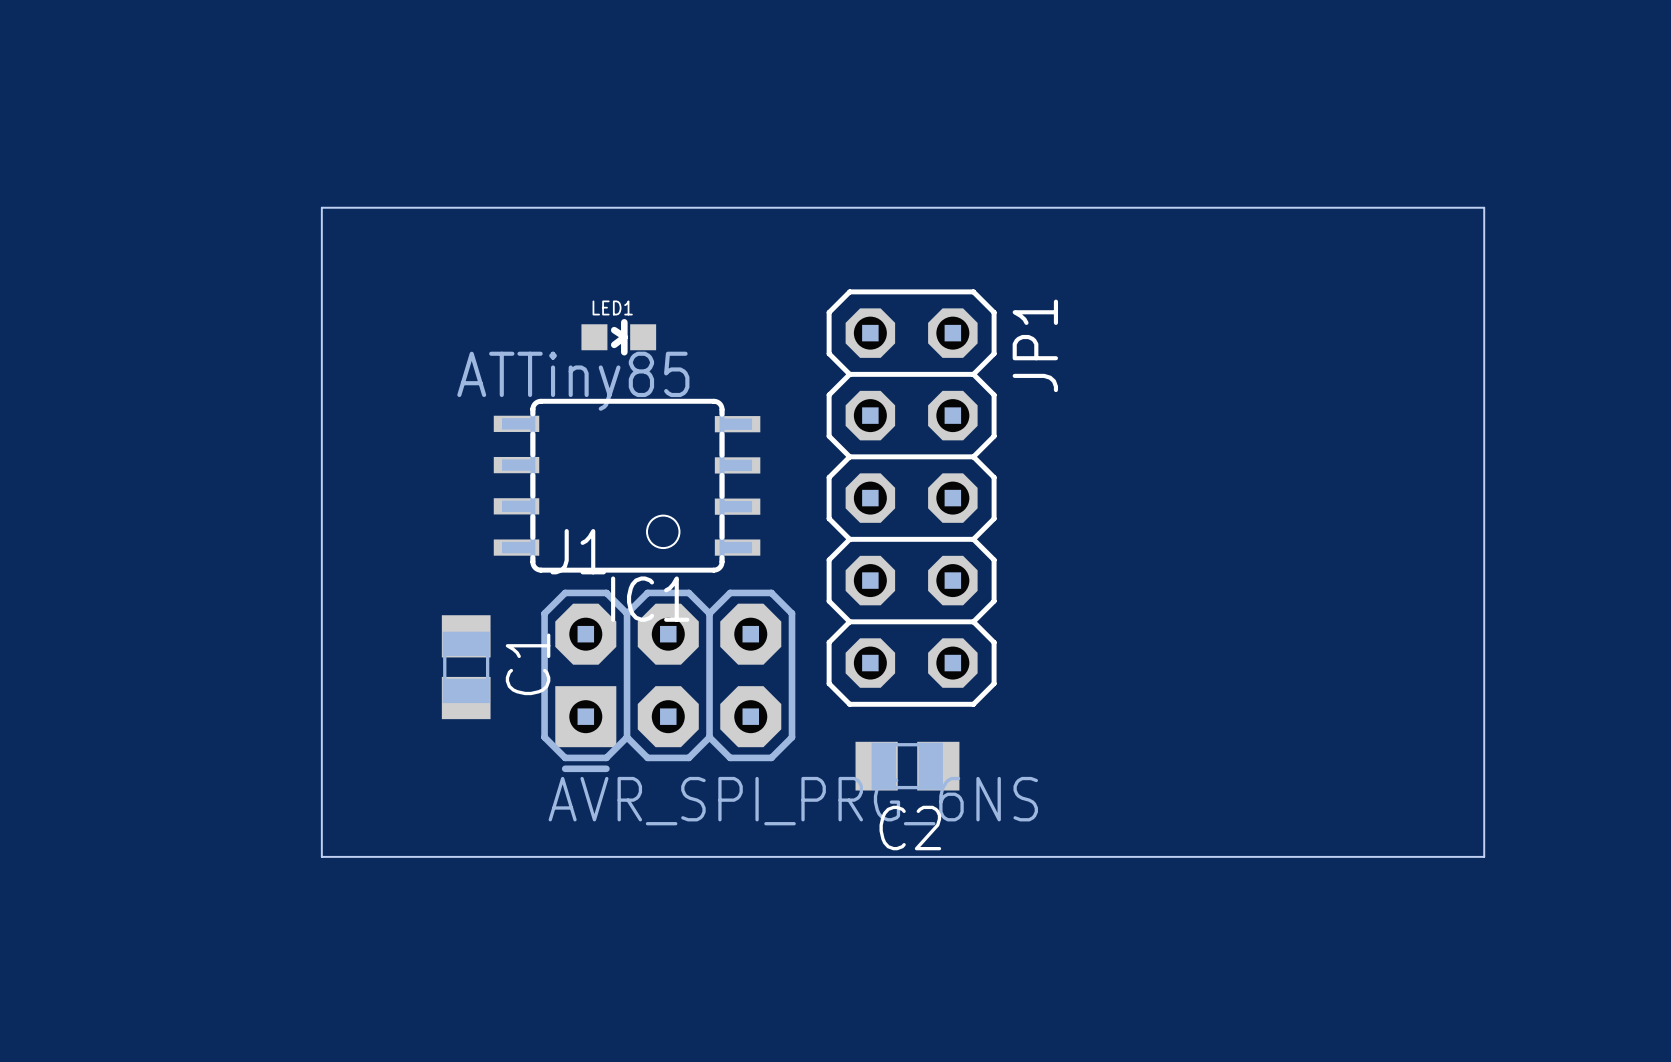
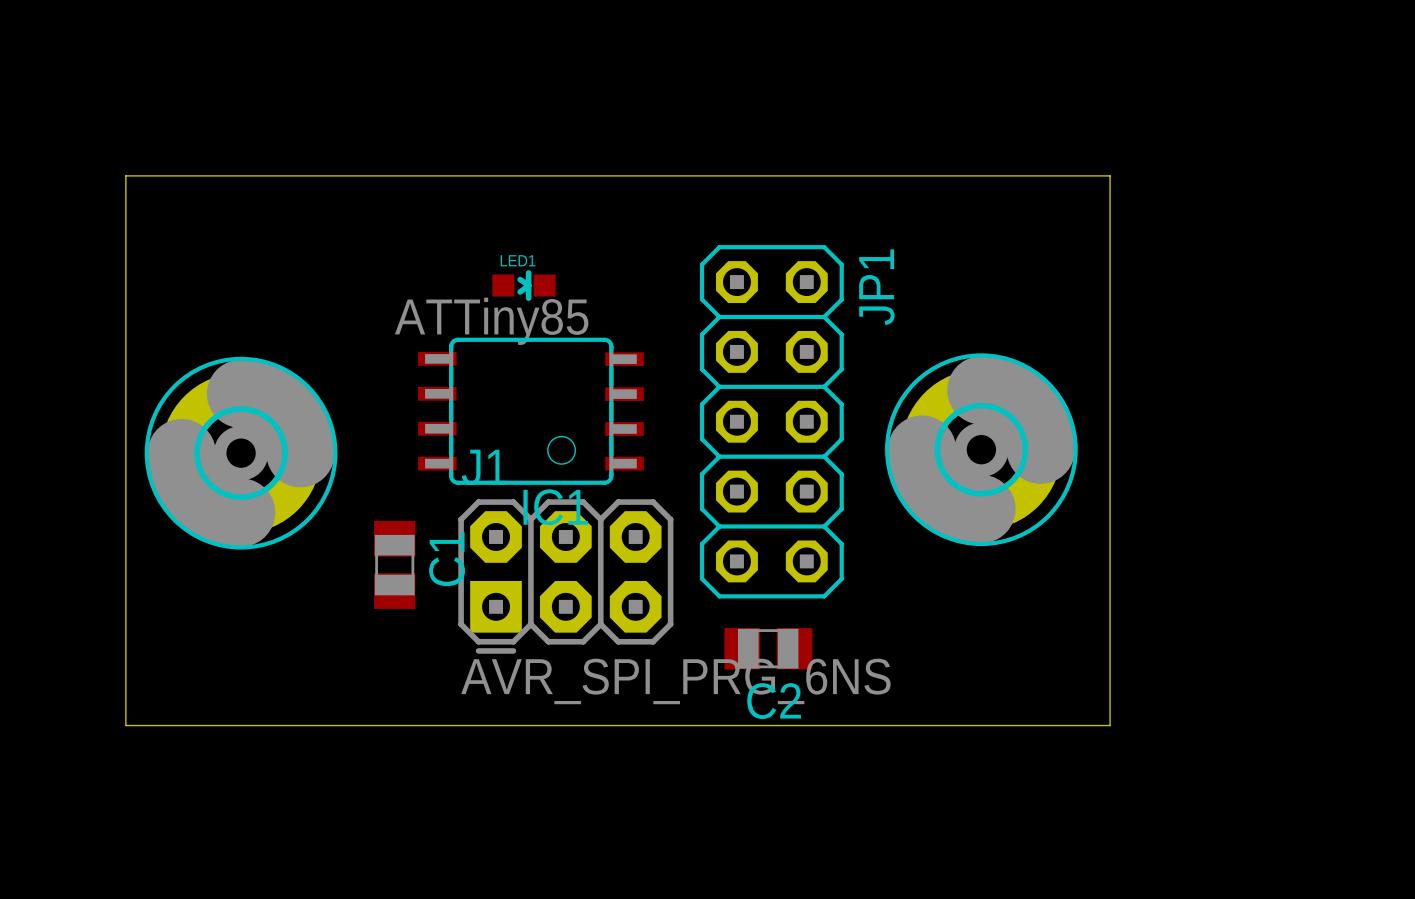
board edge: (321, 207) (321, 856) -> (272, 175) (125, 175) (125, 725) (272, 725)
board edge: (1311, 207) (1484, 207) (1484, 856) (1311, 856) -> (1110, 175) (1110, 725)
part: none -> (981, 449)
part: none -> (241, 453)

